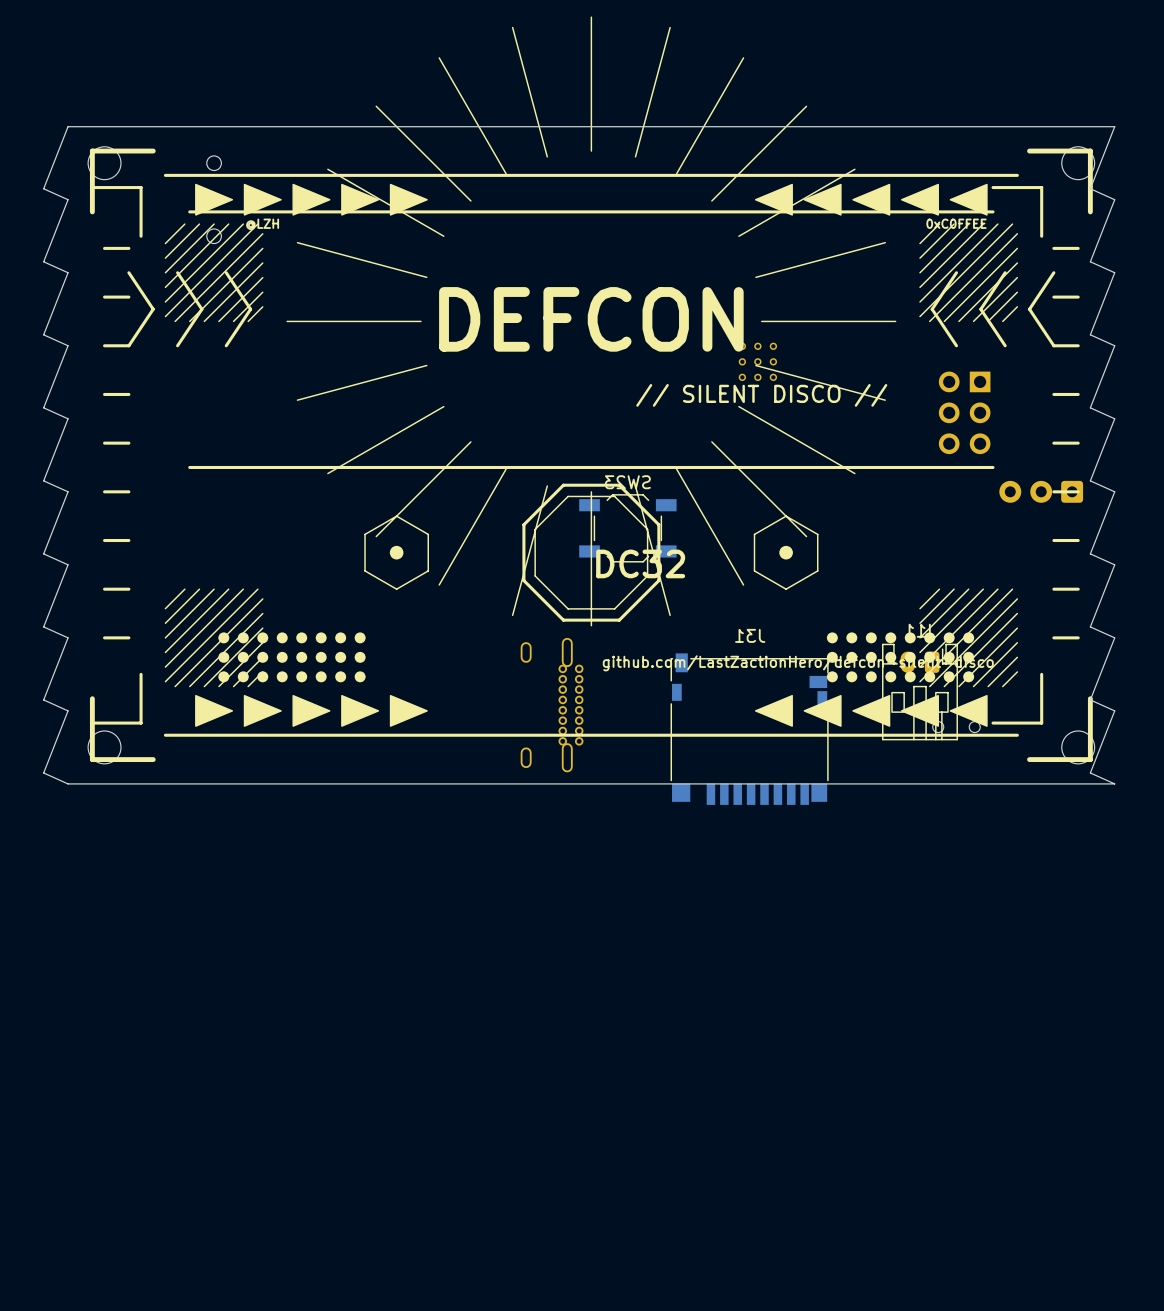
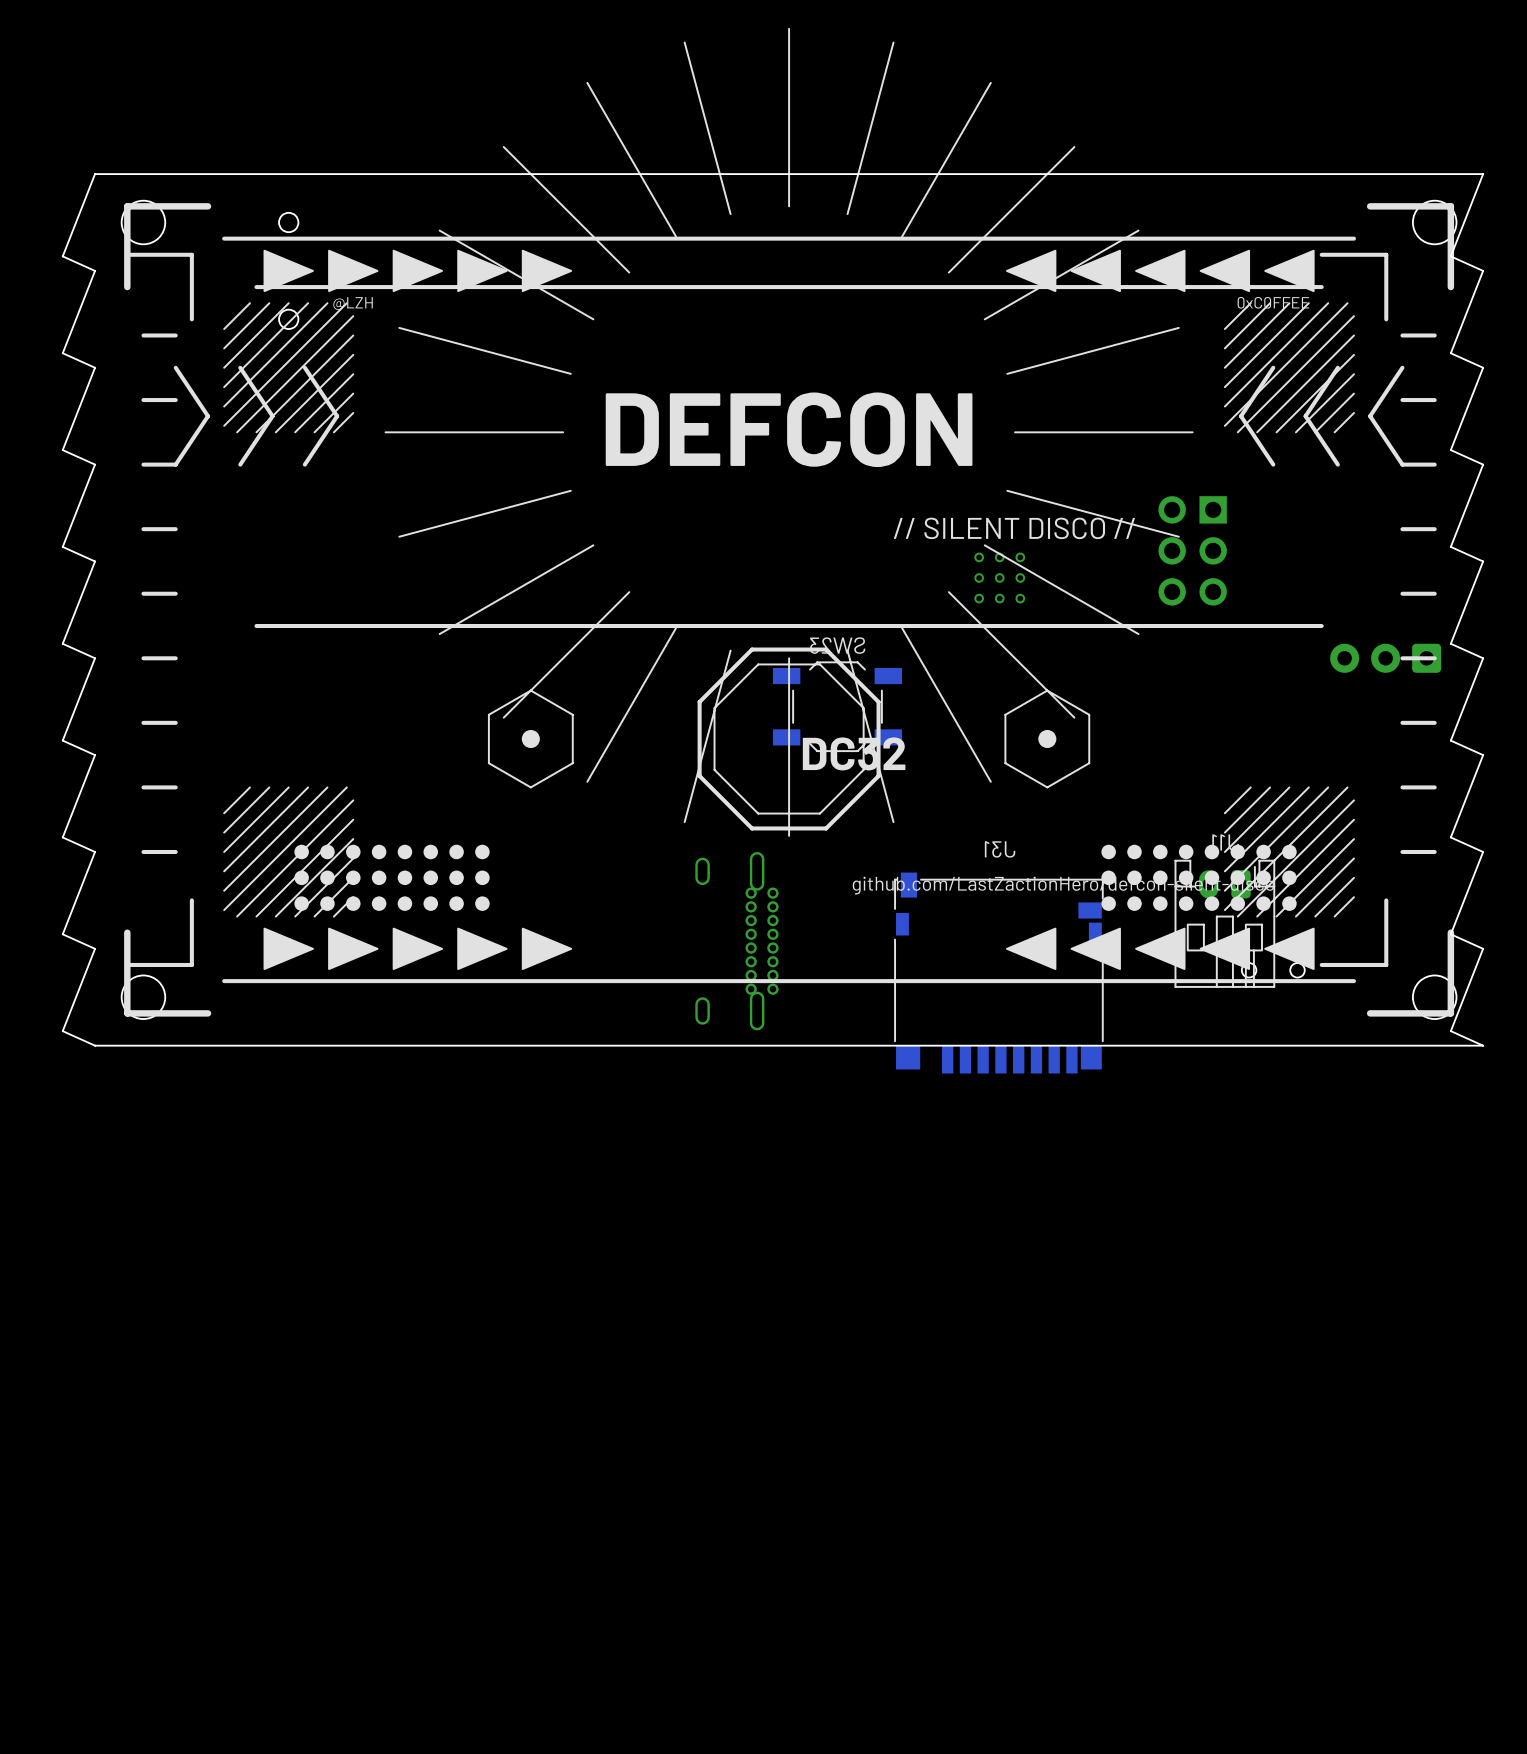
part position: (757, 361) -> (999, 577)
part position: (964, 412) -> (1192, 550)

